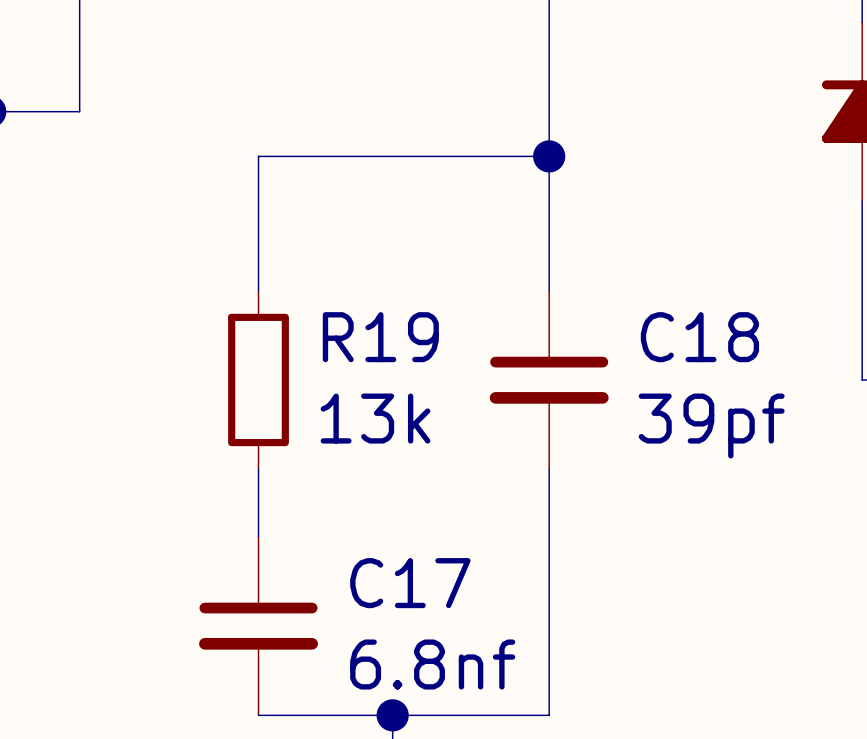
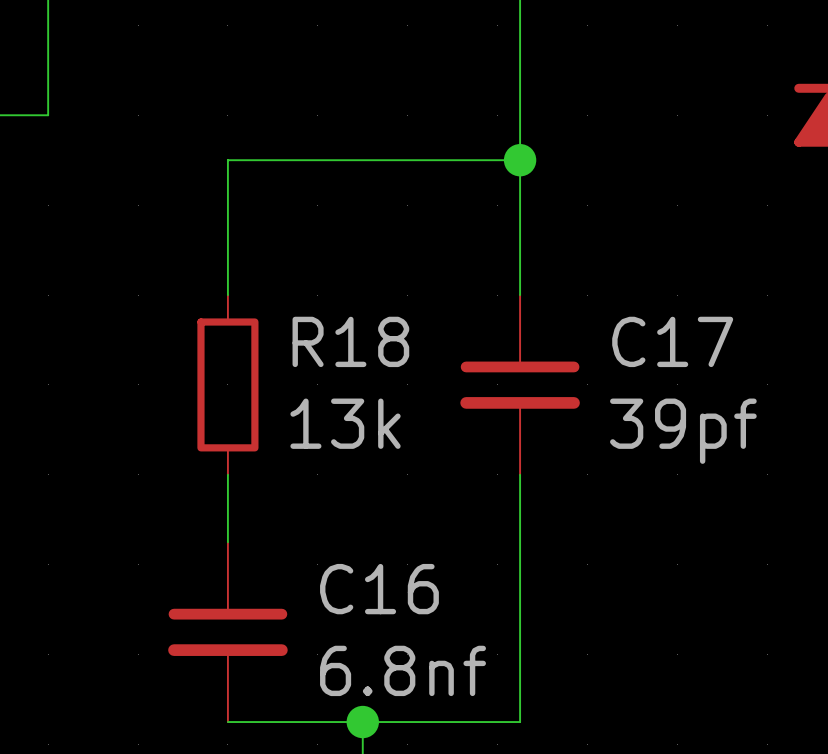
R19 name: R19 (380, 337) -> R18 (350, 341)
C18 name: C18 (699, 337) -> C17 (672, 341)
C17 name: C17 (410, 583) -> C16 (379, 589)

